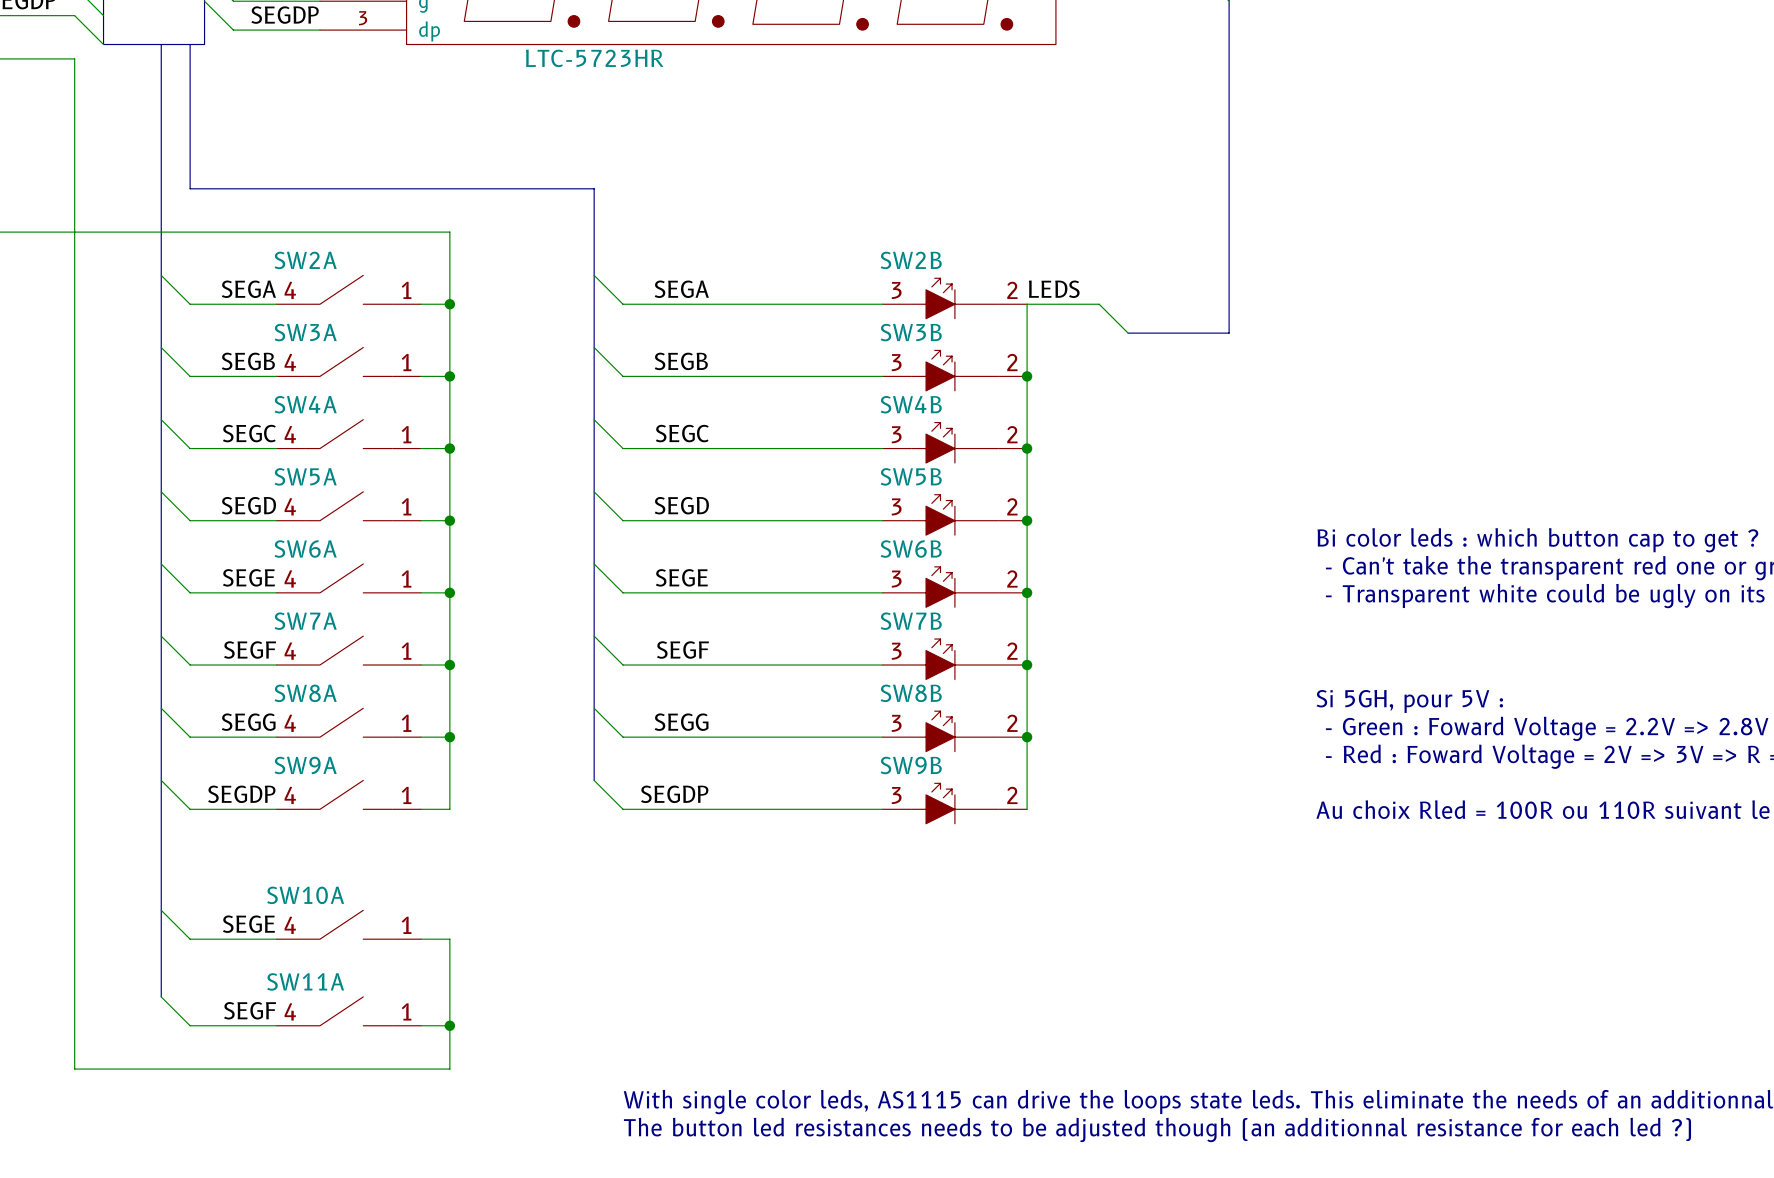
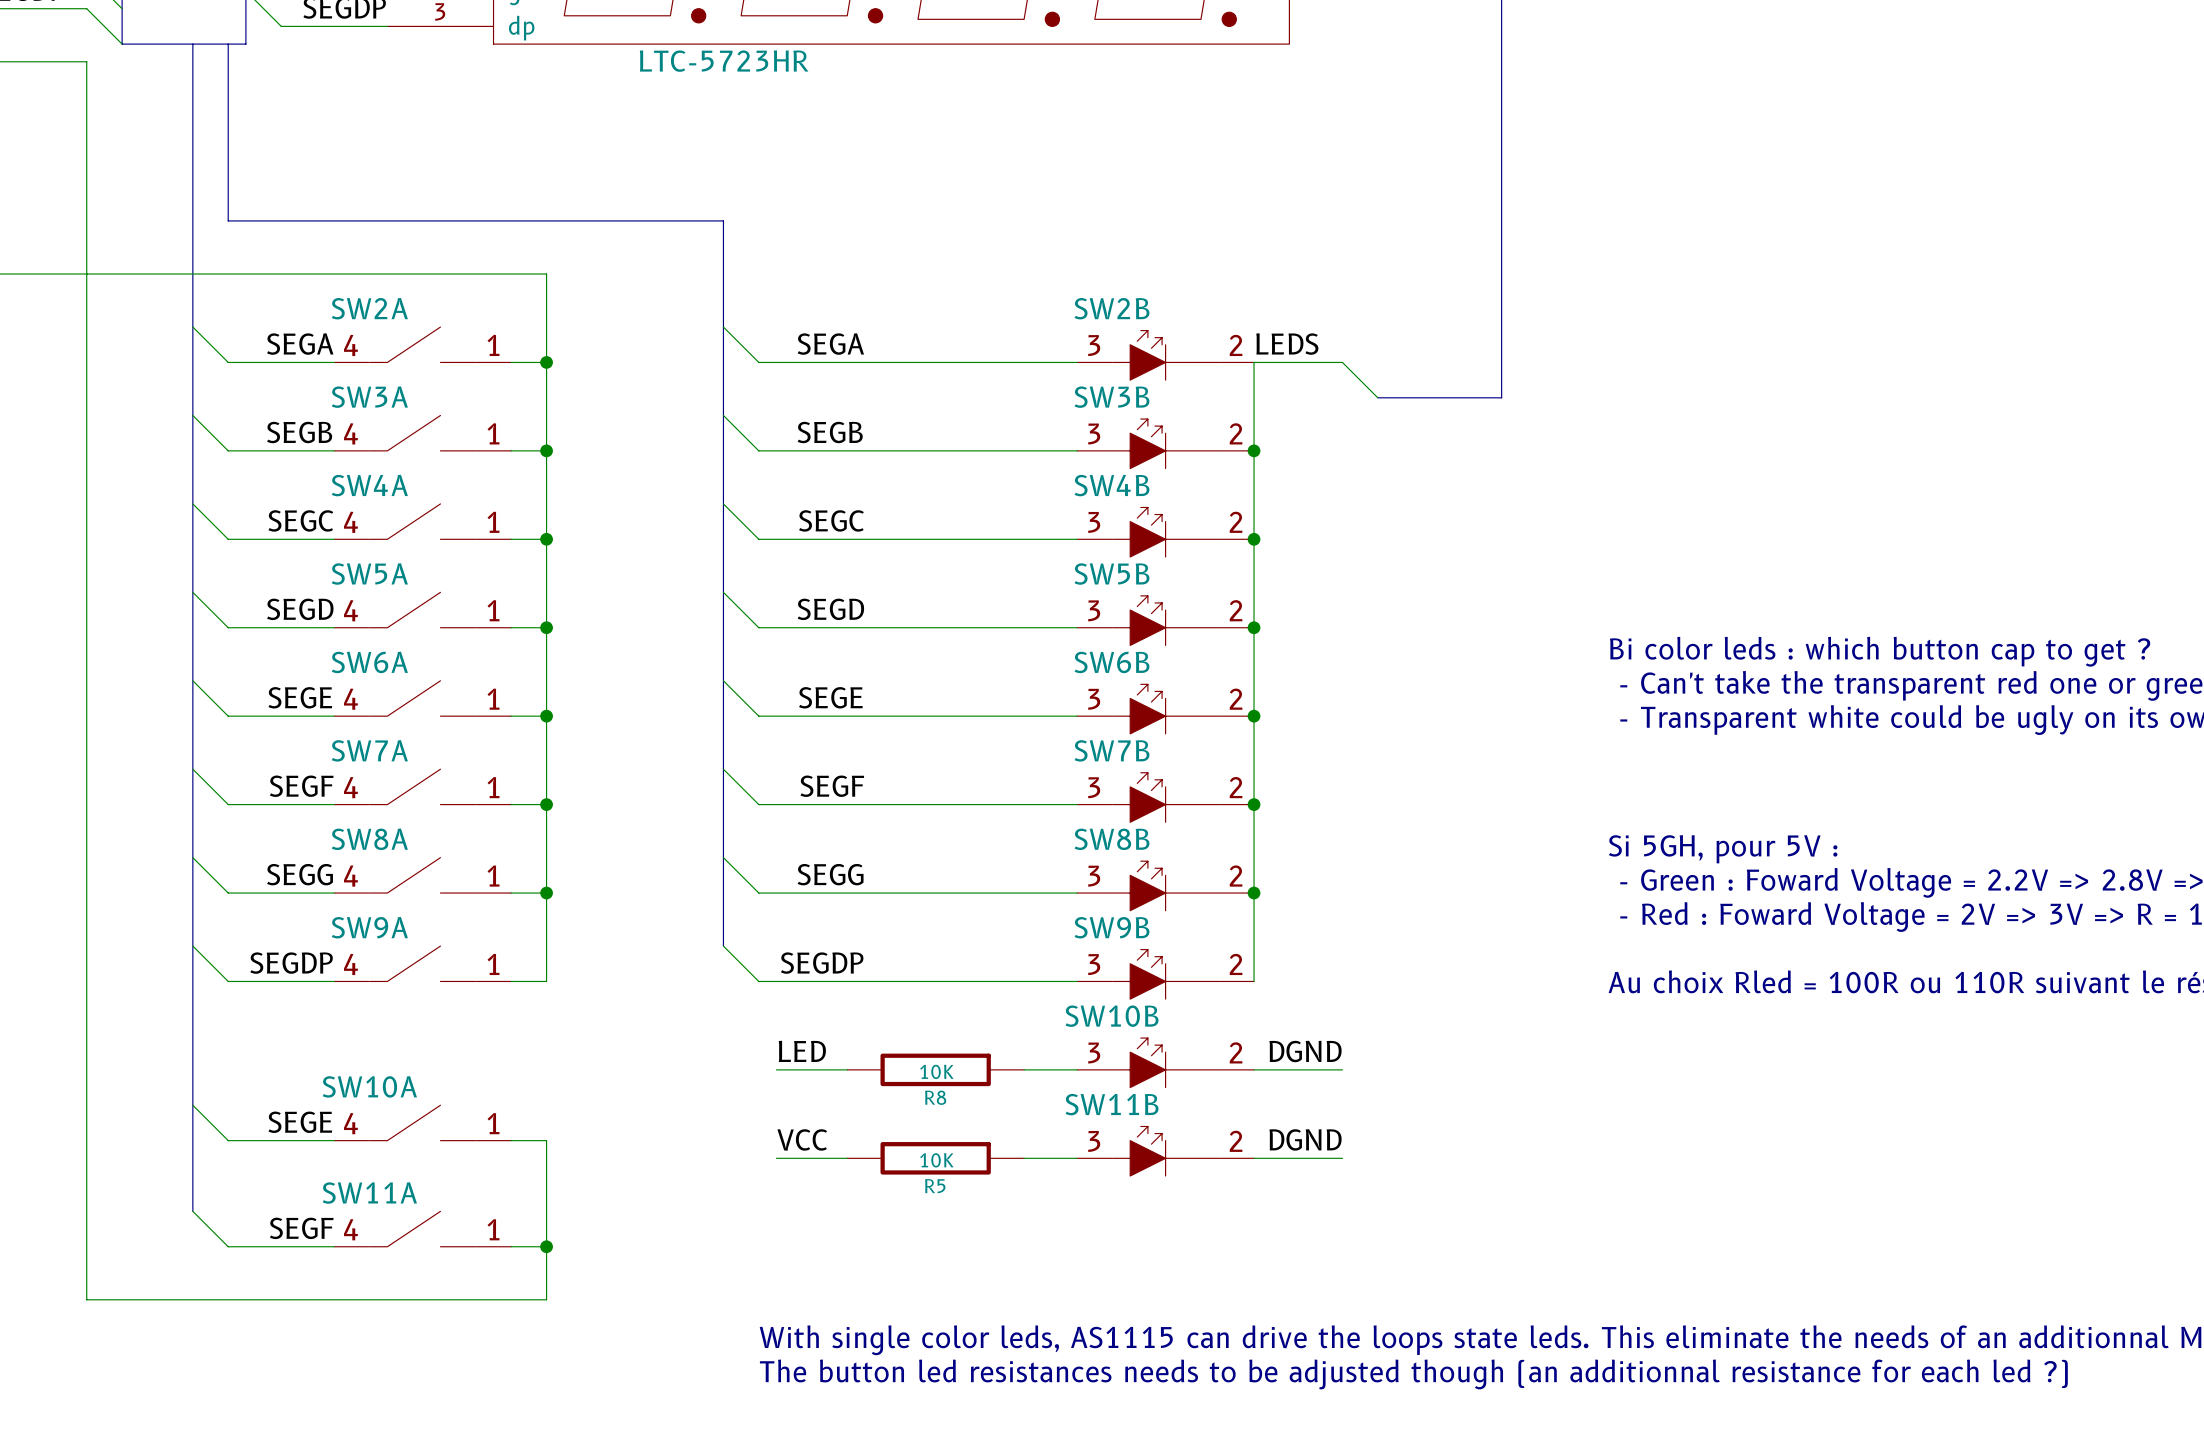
label: none -> LED (802, 1051)
label: none -> DGND (1305, 1051)
SW10B: none -> (1165, 1062)
wire: none -> (776, 1069) (847, 1069)
R8: none -> 10K (935, 1069)
wire: none -> (1024, 1069) (1077, 1069)
wire: none -> (1254, 1069) (1342, 1069)
label: none -> VCC (802, 1139)
label: none -> DGND (1305, 1139)
SW11B: none -> (1165, 1151)
wire: none -> (776, 1158) (847, 1158)
R5: none -> 10K (935, 1158)
wire: none -> (1024, 1158) (1077, 1158)
wire: none -> (1254, 1158) (1342, 1158)

